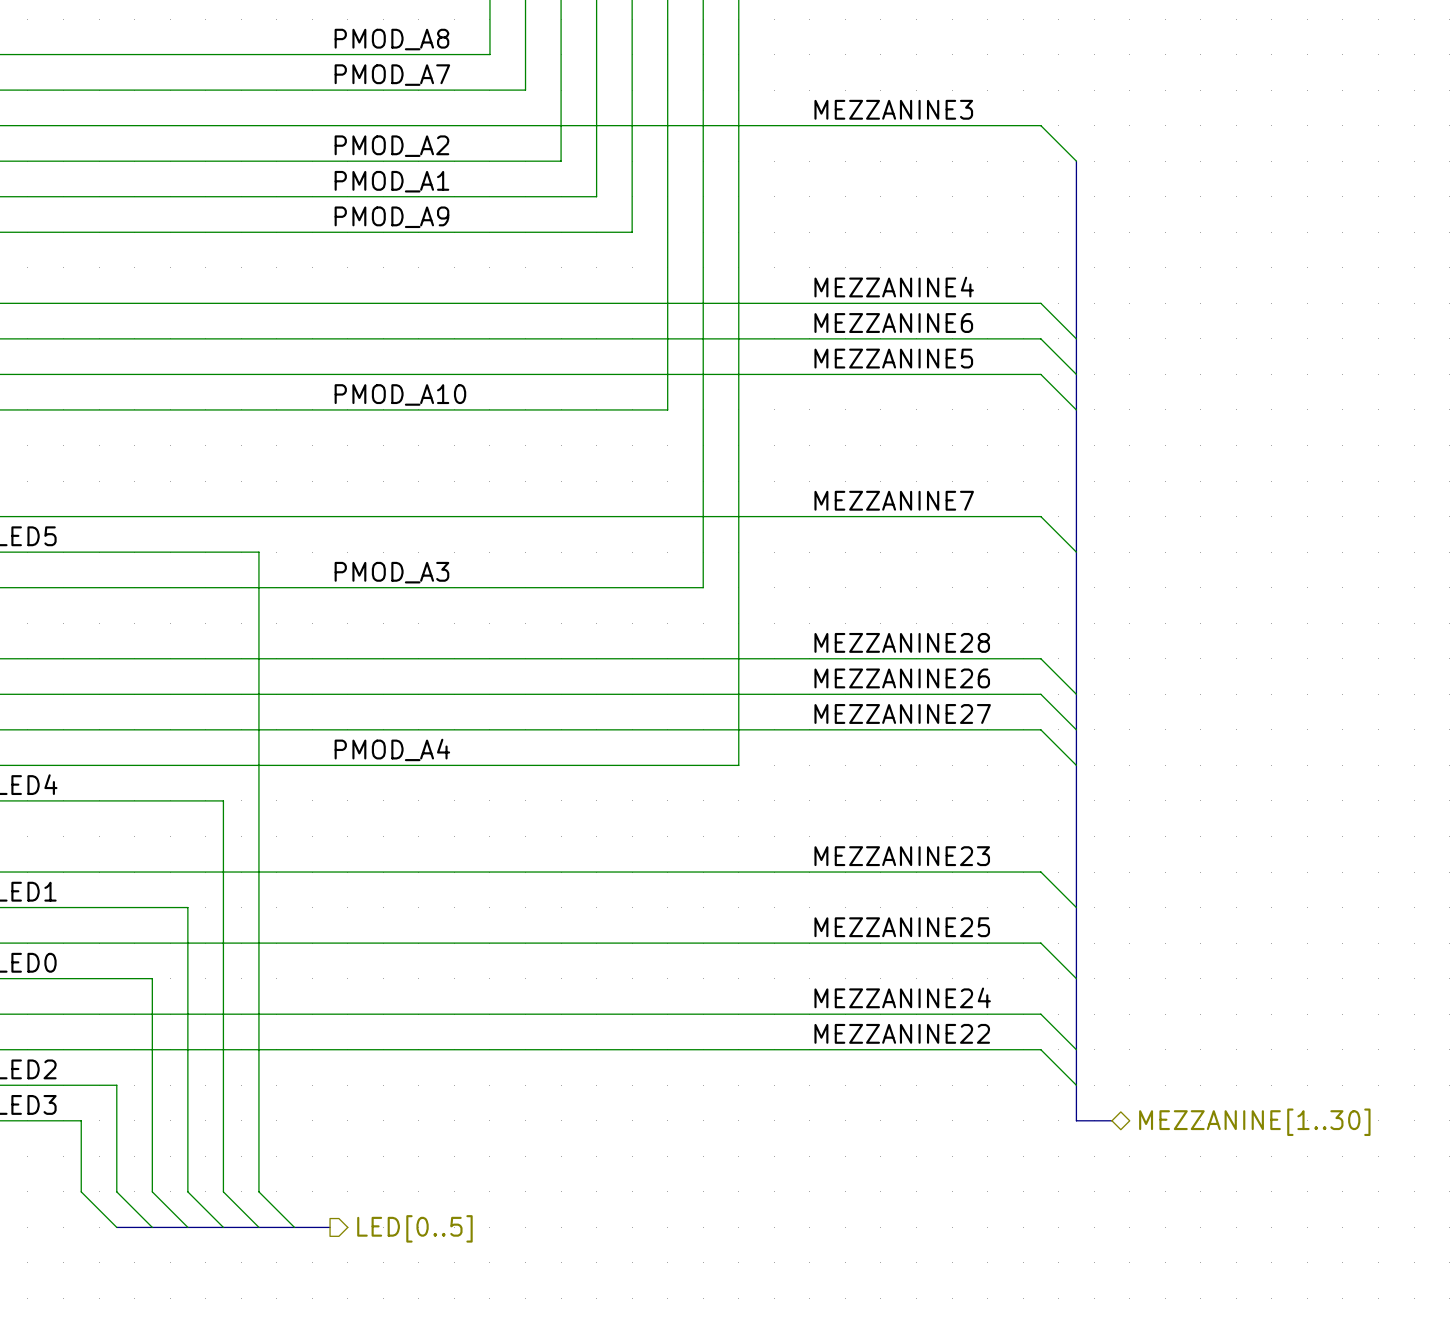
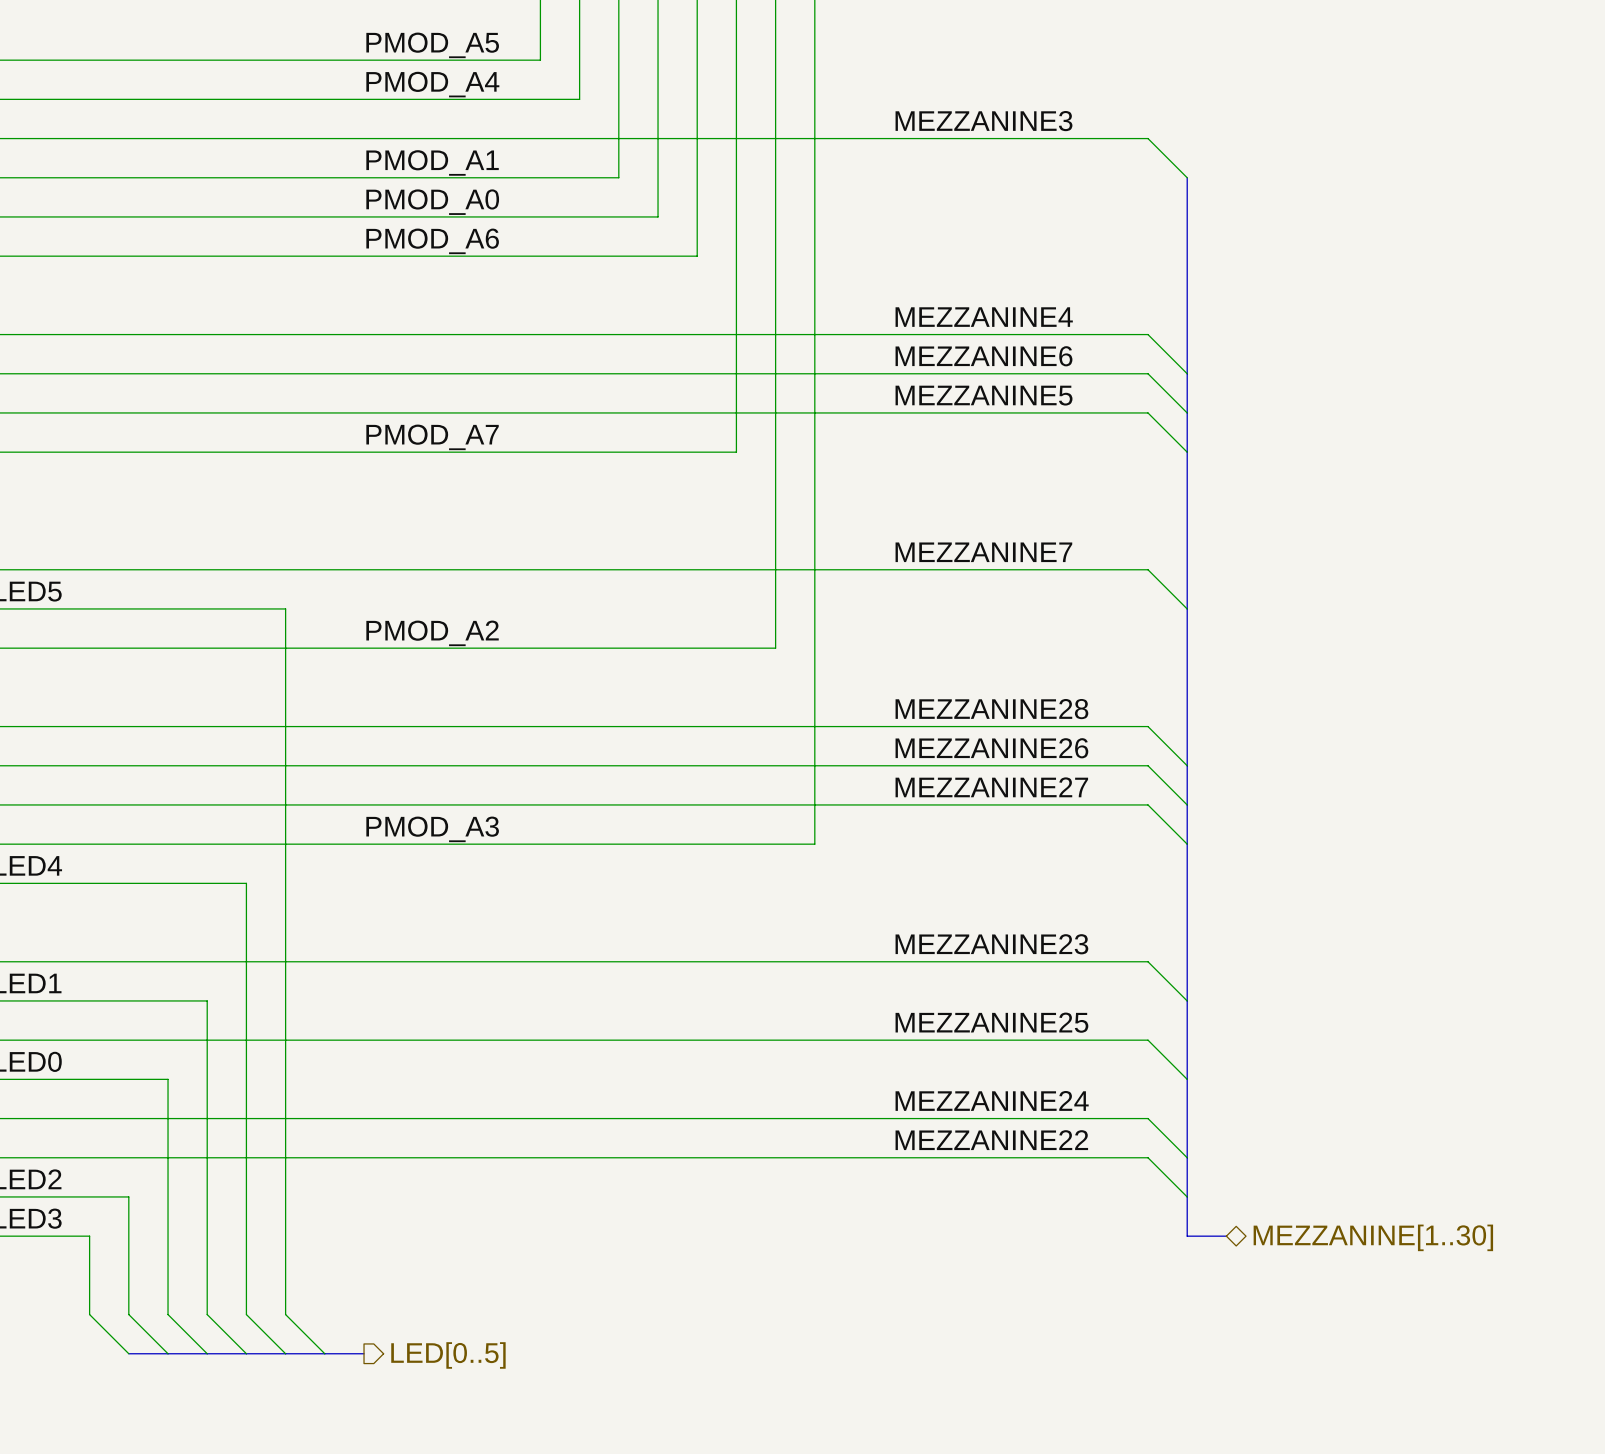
label: PMOD_A8 (391, 39) -> PMOD_A5 (432, 45)
label: PMOD_A7 (392, 75) -> PMOD_A4 (432, 84)
label: PMOD_A2 (391, 146) -> PMOD_A1 (432, 162)
label: PMOD_A1 (391, 181) -> PMOD_A0 (432, 202)
label: PMOD_A9 (391, 217) -> PMOD_A6 (432, 241)
label: PMOD_A10 (400, 394) -> PMOD_A7 (432, 437)
label: PMOD_A3 (391, 572) -> PMOD_A2 (432, 633)
label: PMOD_A4 (392, 749) -> PMOD_A3 (432, 829)

